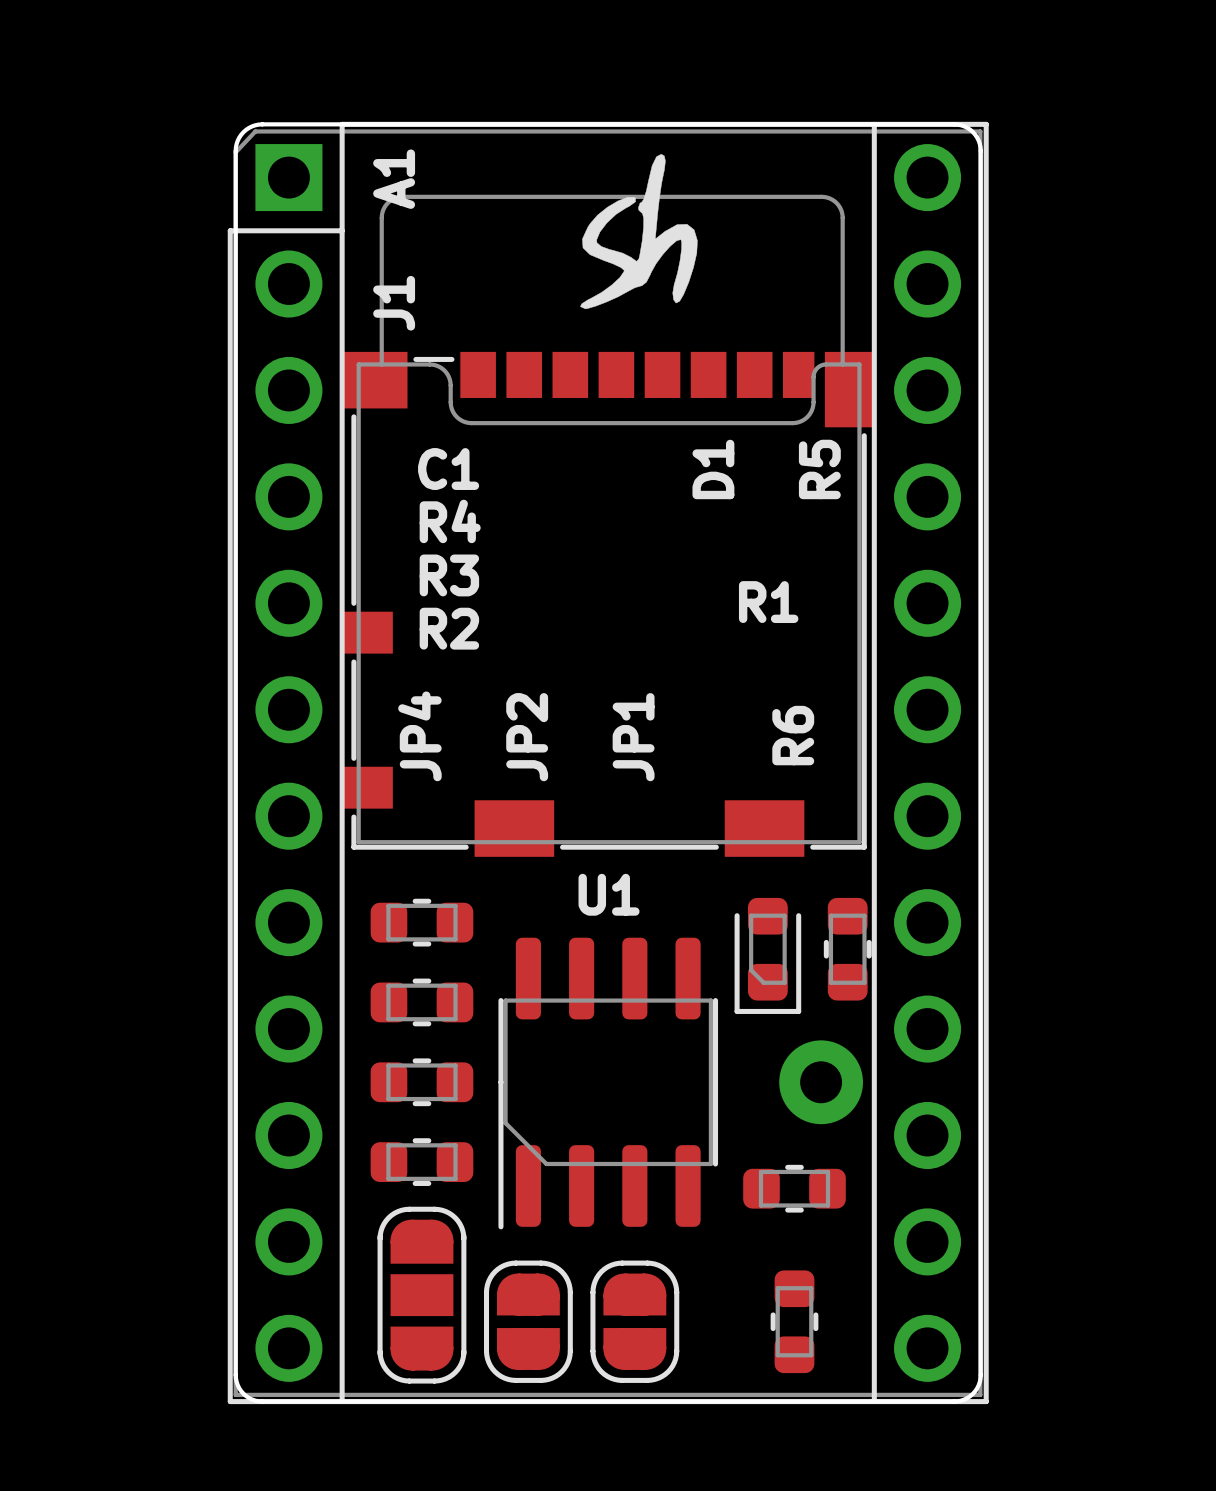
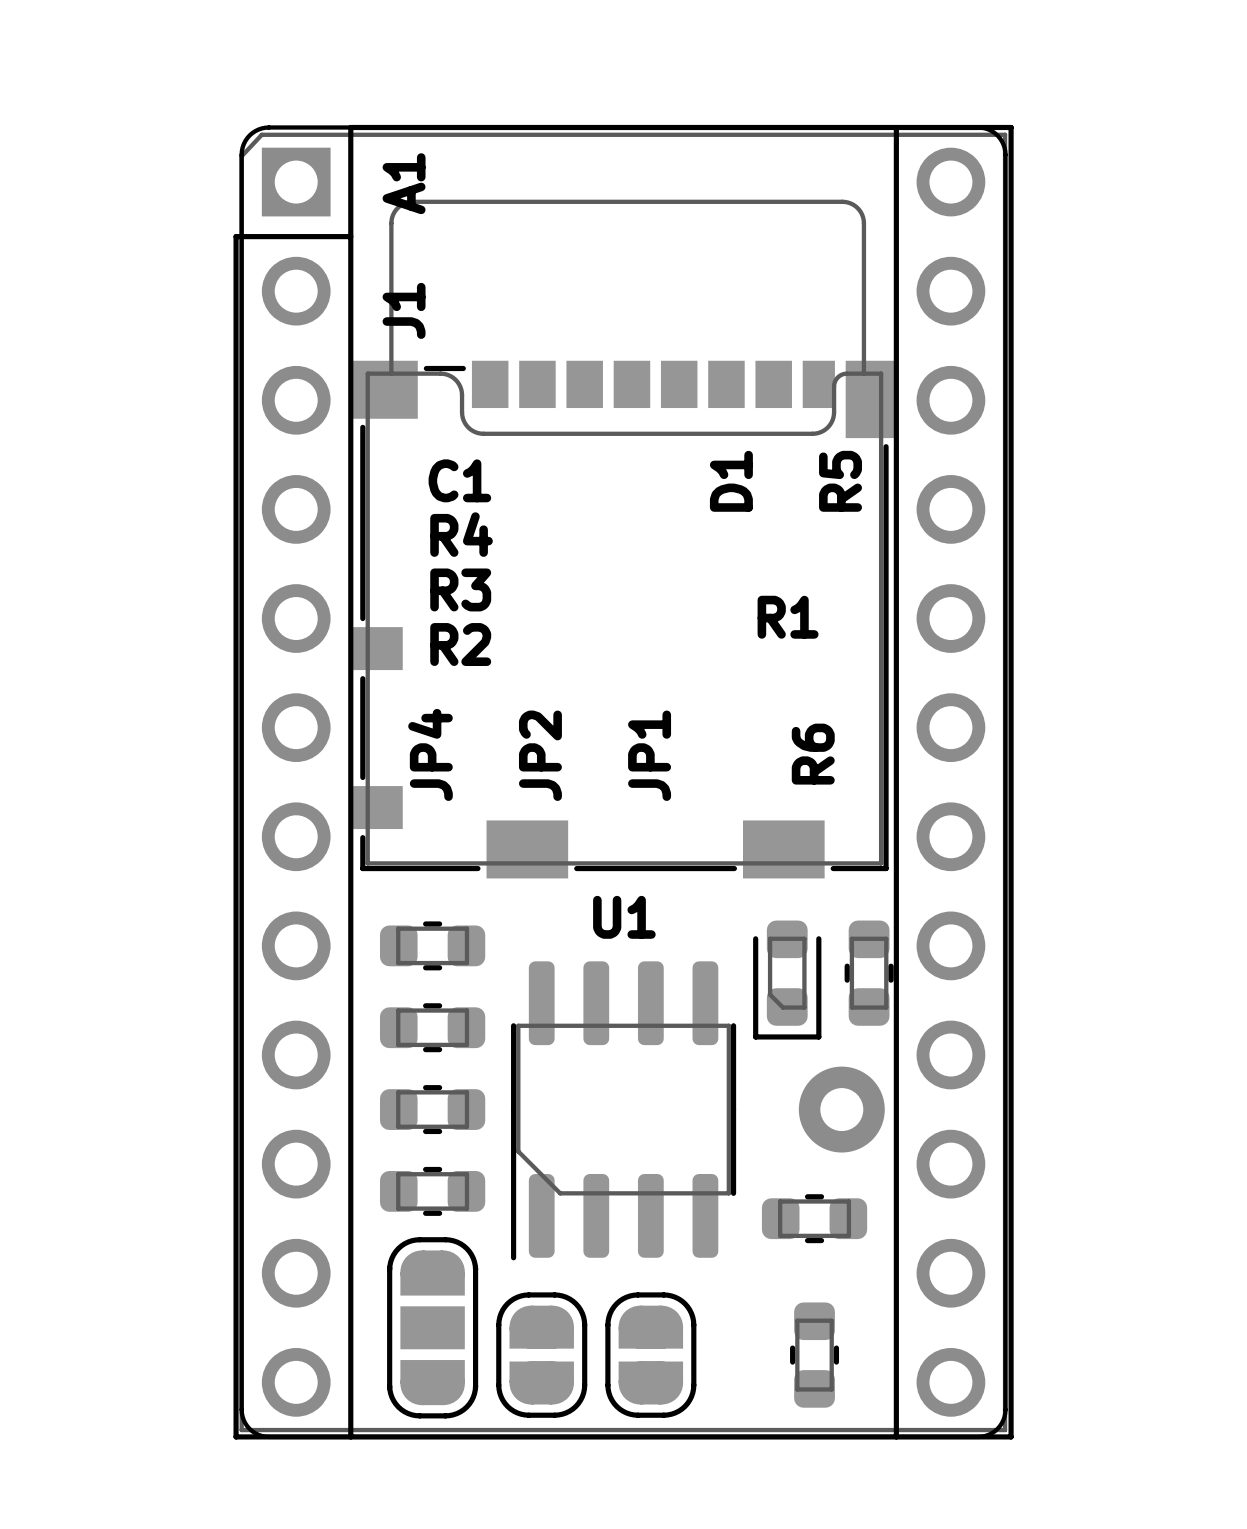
drawing: [580, 154, 698, 310] -> none

